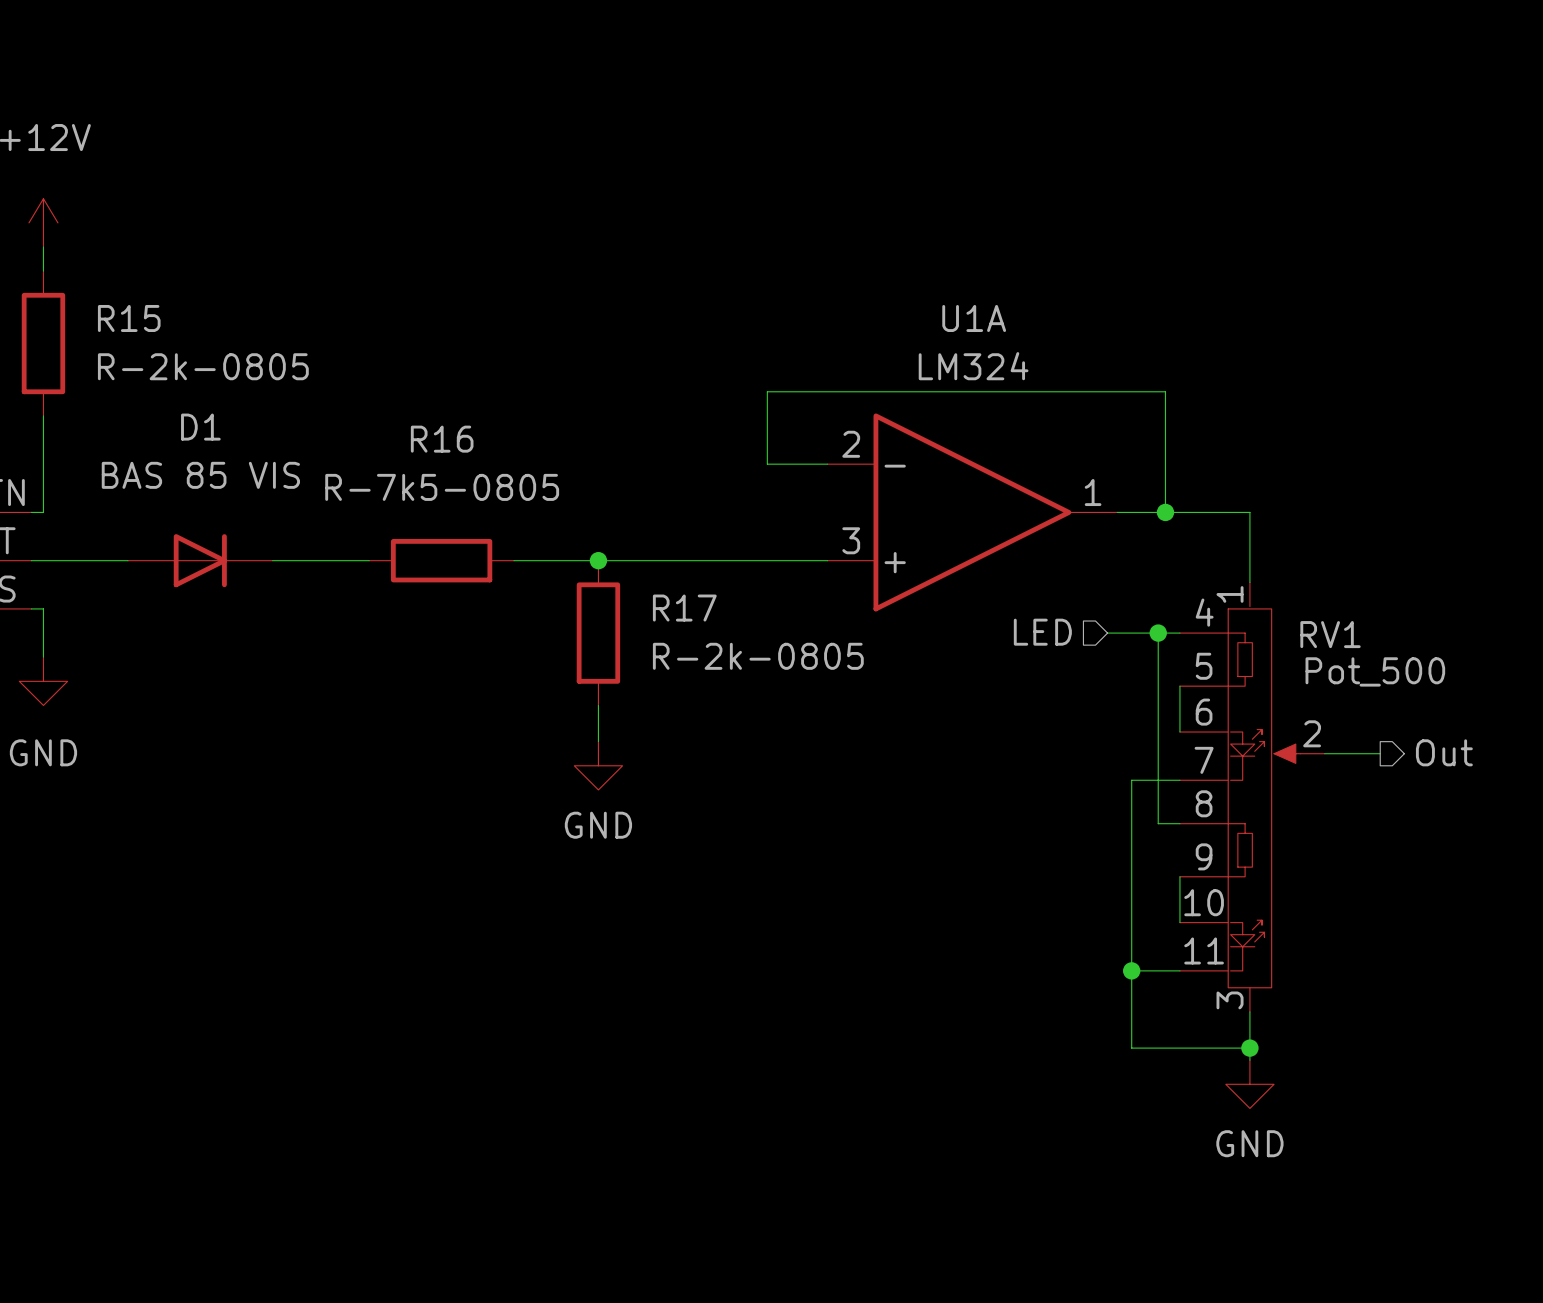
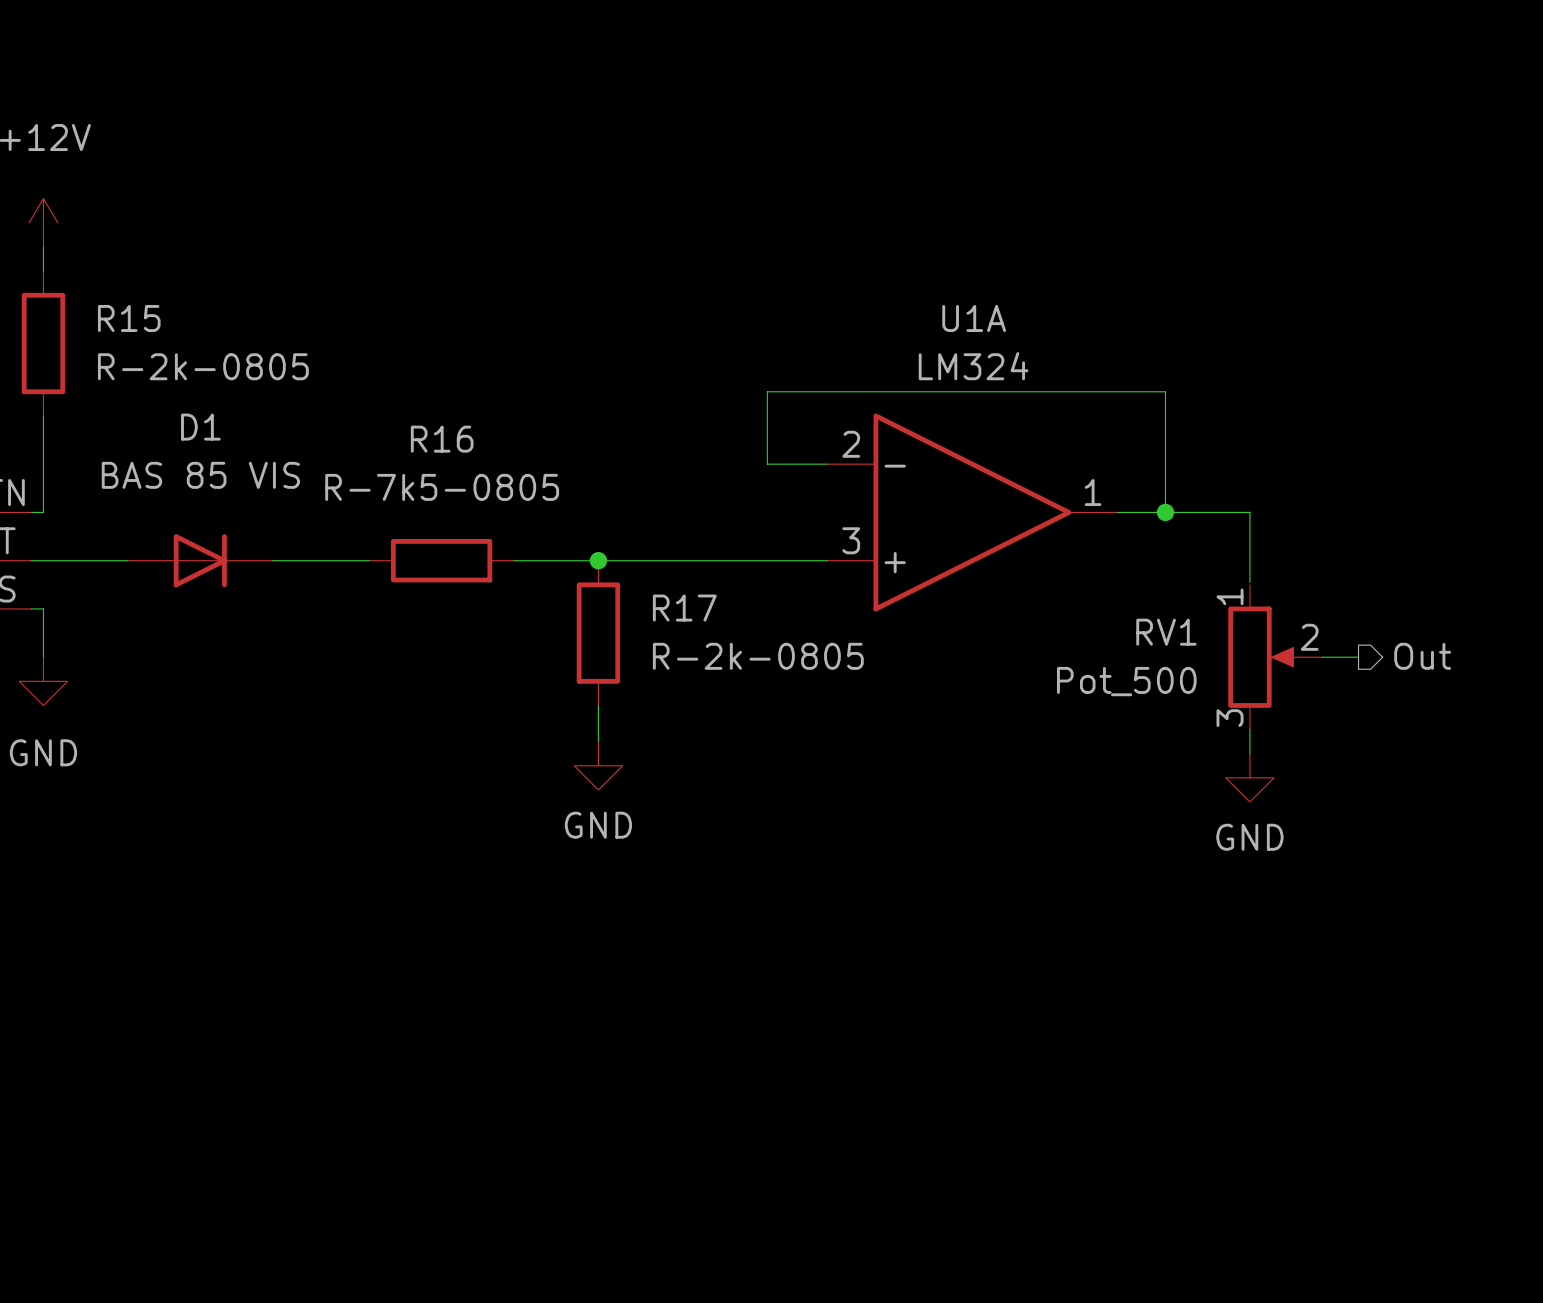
RV1 symbol: [1179, 582, 1325, 1012] -> [1228, 584, 1323, 730]
hierarchical label: LED (1042, 632) -> none
wire: (1107, 633) (1179, 633) -> none
wire: (1158, 633) (1158, 823) (1179, 823) -> none
junction: (1158, 633) -> none
RV1 name position: RV1 (1330, 634) -> RV1 (1166, 632)
wire: none -> (1322, 657) (1358, 657)
RV1 value position: Pot_500 (1375, 671) -> Pot_500 (1126, 681)
wire: (1179, 686) (1179, 732) -> none
wire: none -> (1249, 729) (1249, 753)
hierarchical label position: Out (1444, 752) -> Out (1422, 656)
wire: (1324, 753) (1380, 753) -> none
wire: (1179, 780) (1131, 780) (1131, 1048) (1249, 1048) -> none
wire: (1179, 876) (1179, 922) -> none
wire: (1131, 970) (1179, 970) -> none
junction: (1131, 970) -> none
wire: (1249, 1011) (1249, 1060) -> none
junction: (1249, 1048) -> none
power symbol position: GND (1249, 1084) -> GND (1249, 777)

